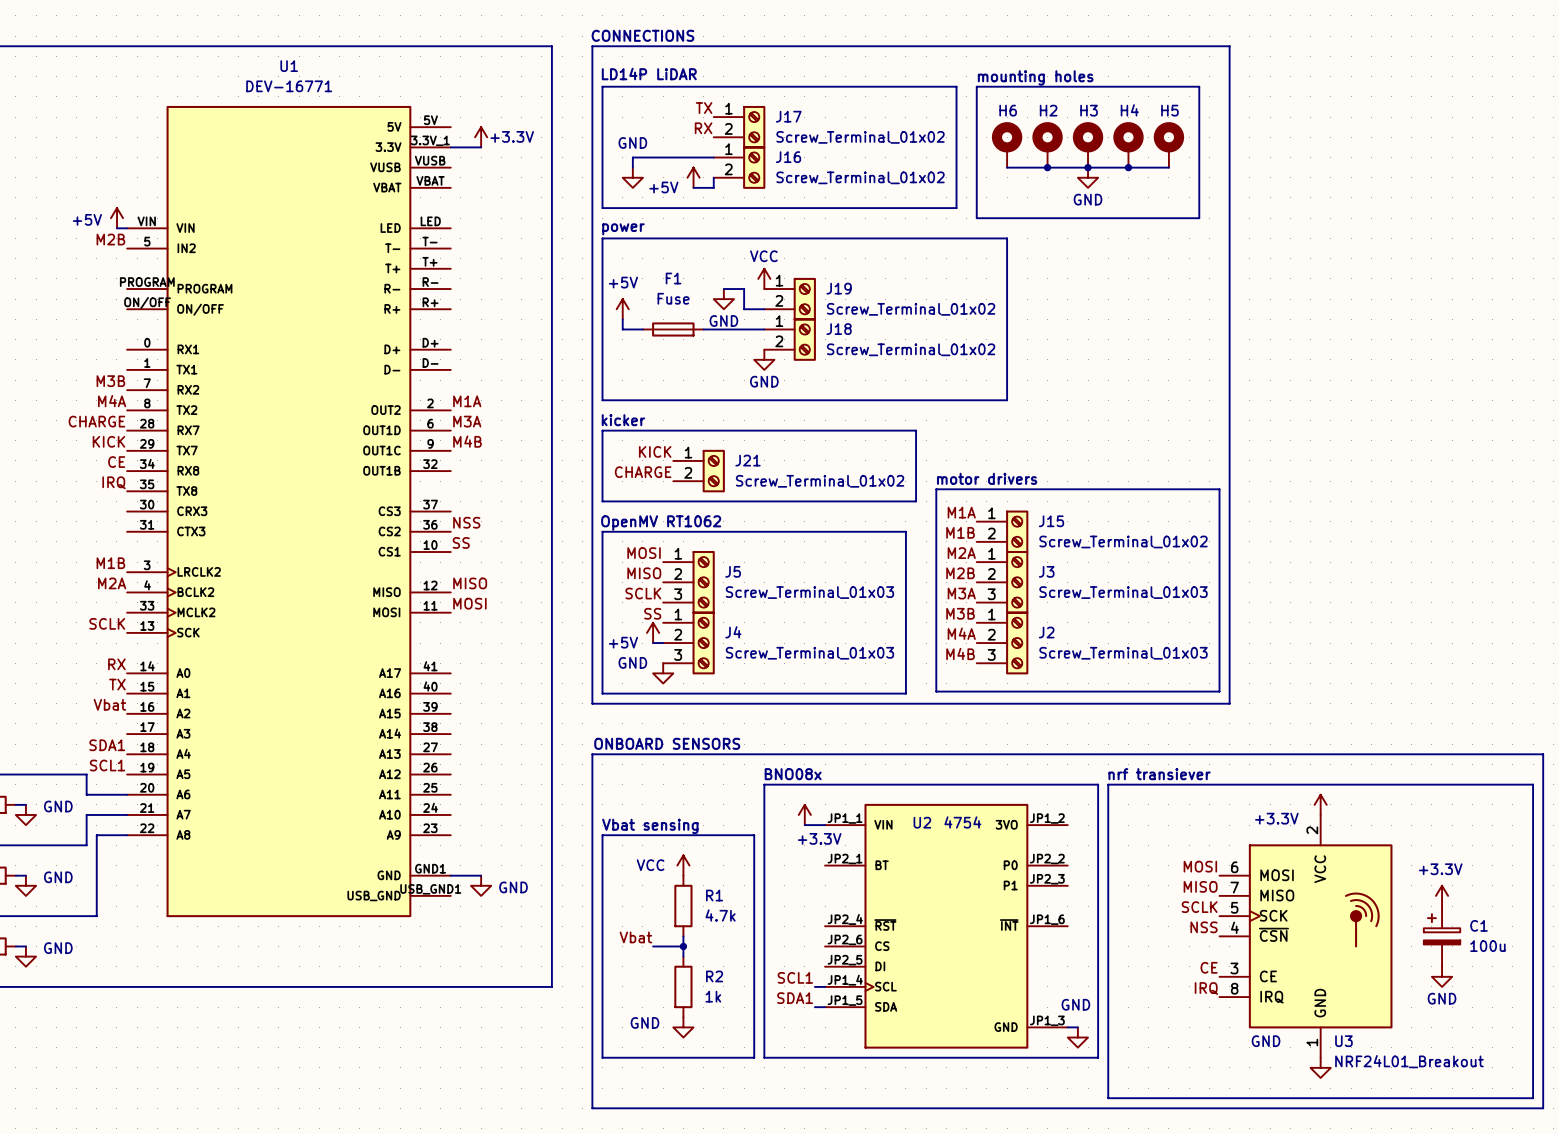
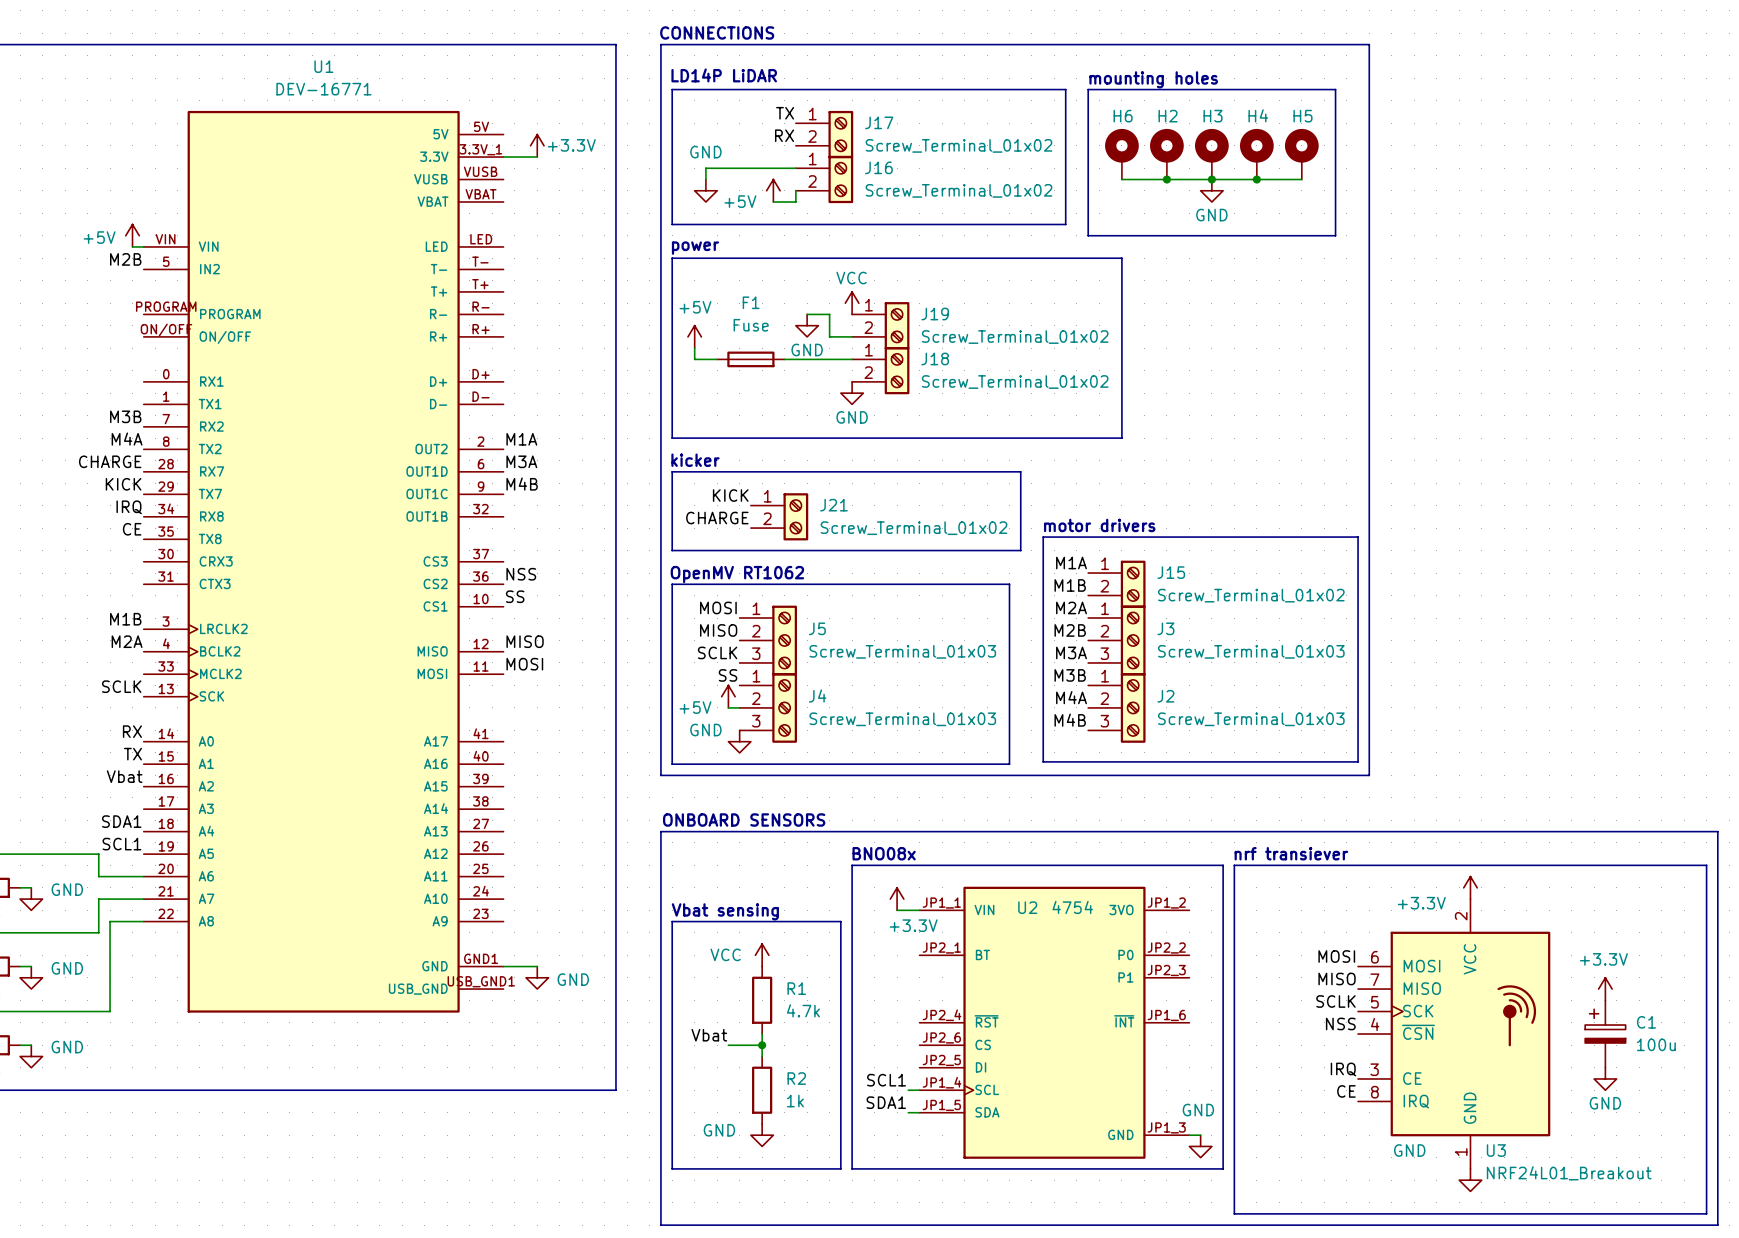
label: CE (116, 462) -> IRQ (129, 507)
label: IRQ (114, 482) -> CE (132, 529)
label: CE (1209, 967) -> IRQ (1343, 1069)
label: IRQ (1206, 988) -> CE (1346, 1091)

